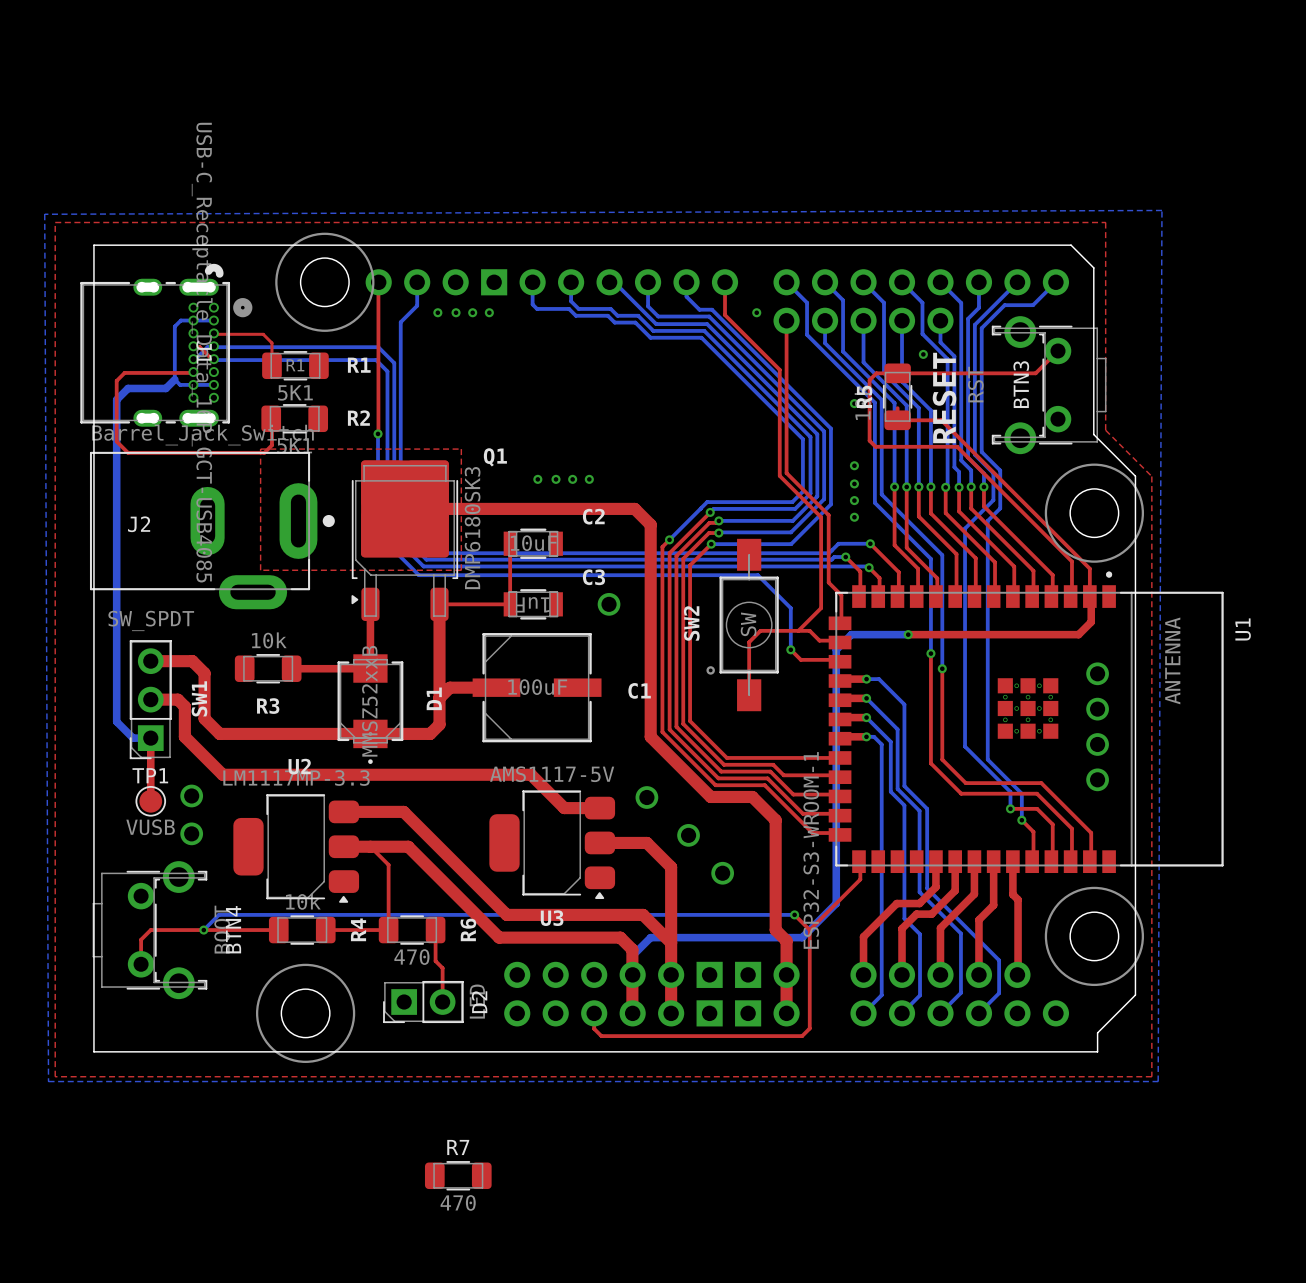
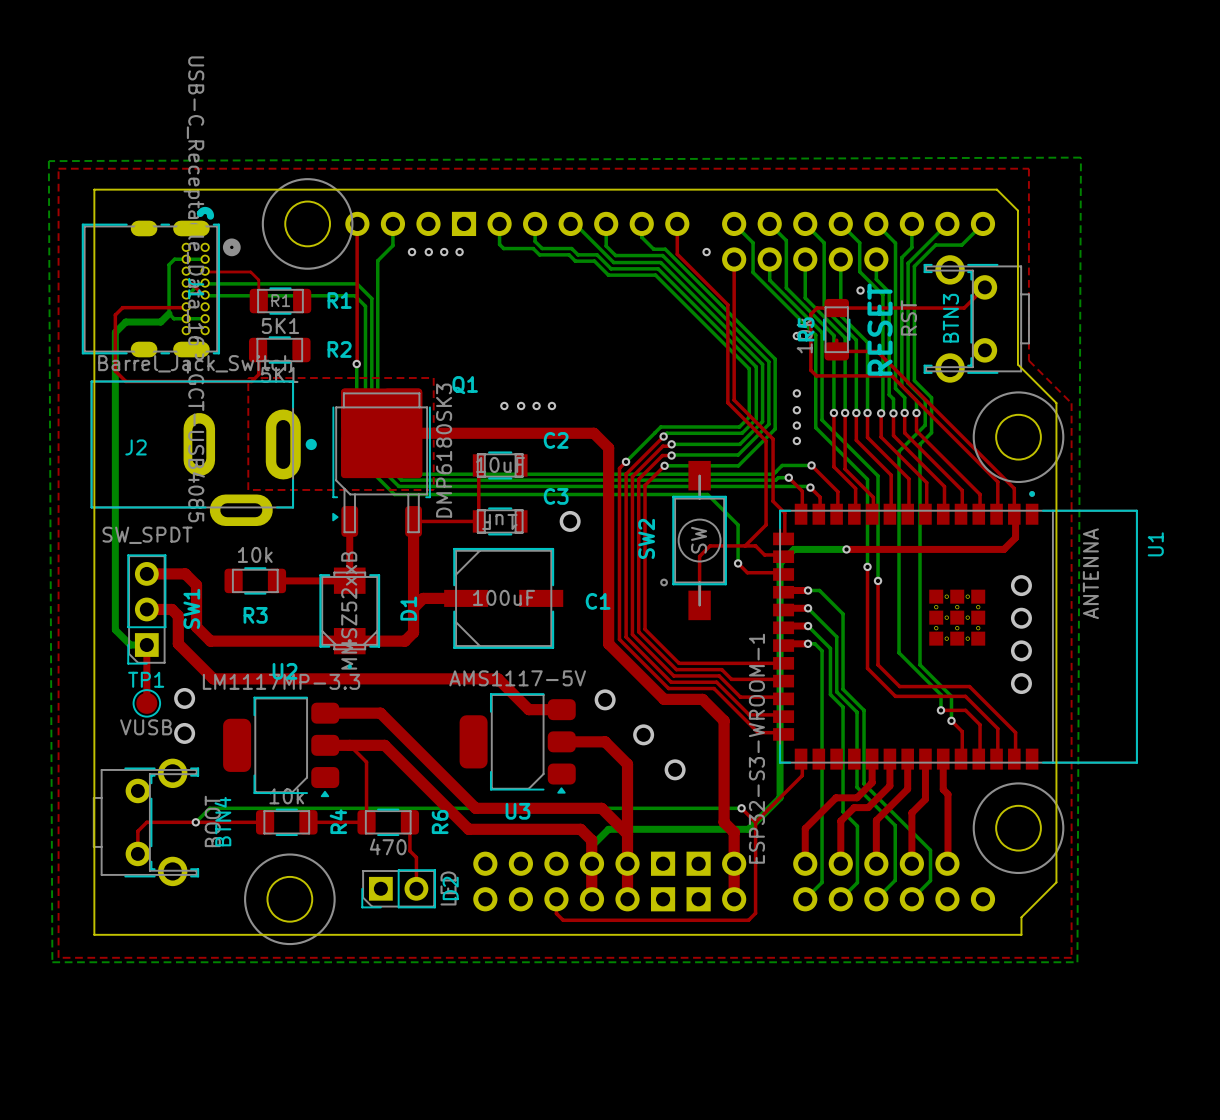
R7: 470 (458, 1175) -> none

